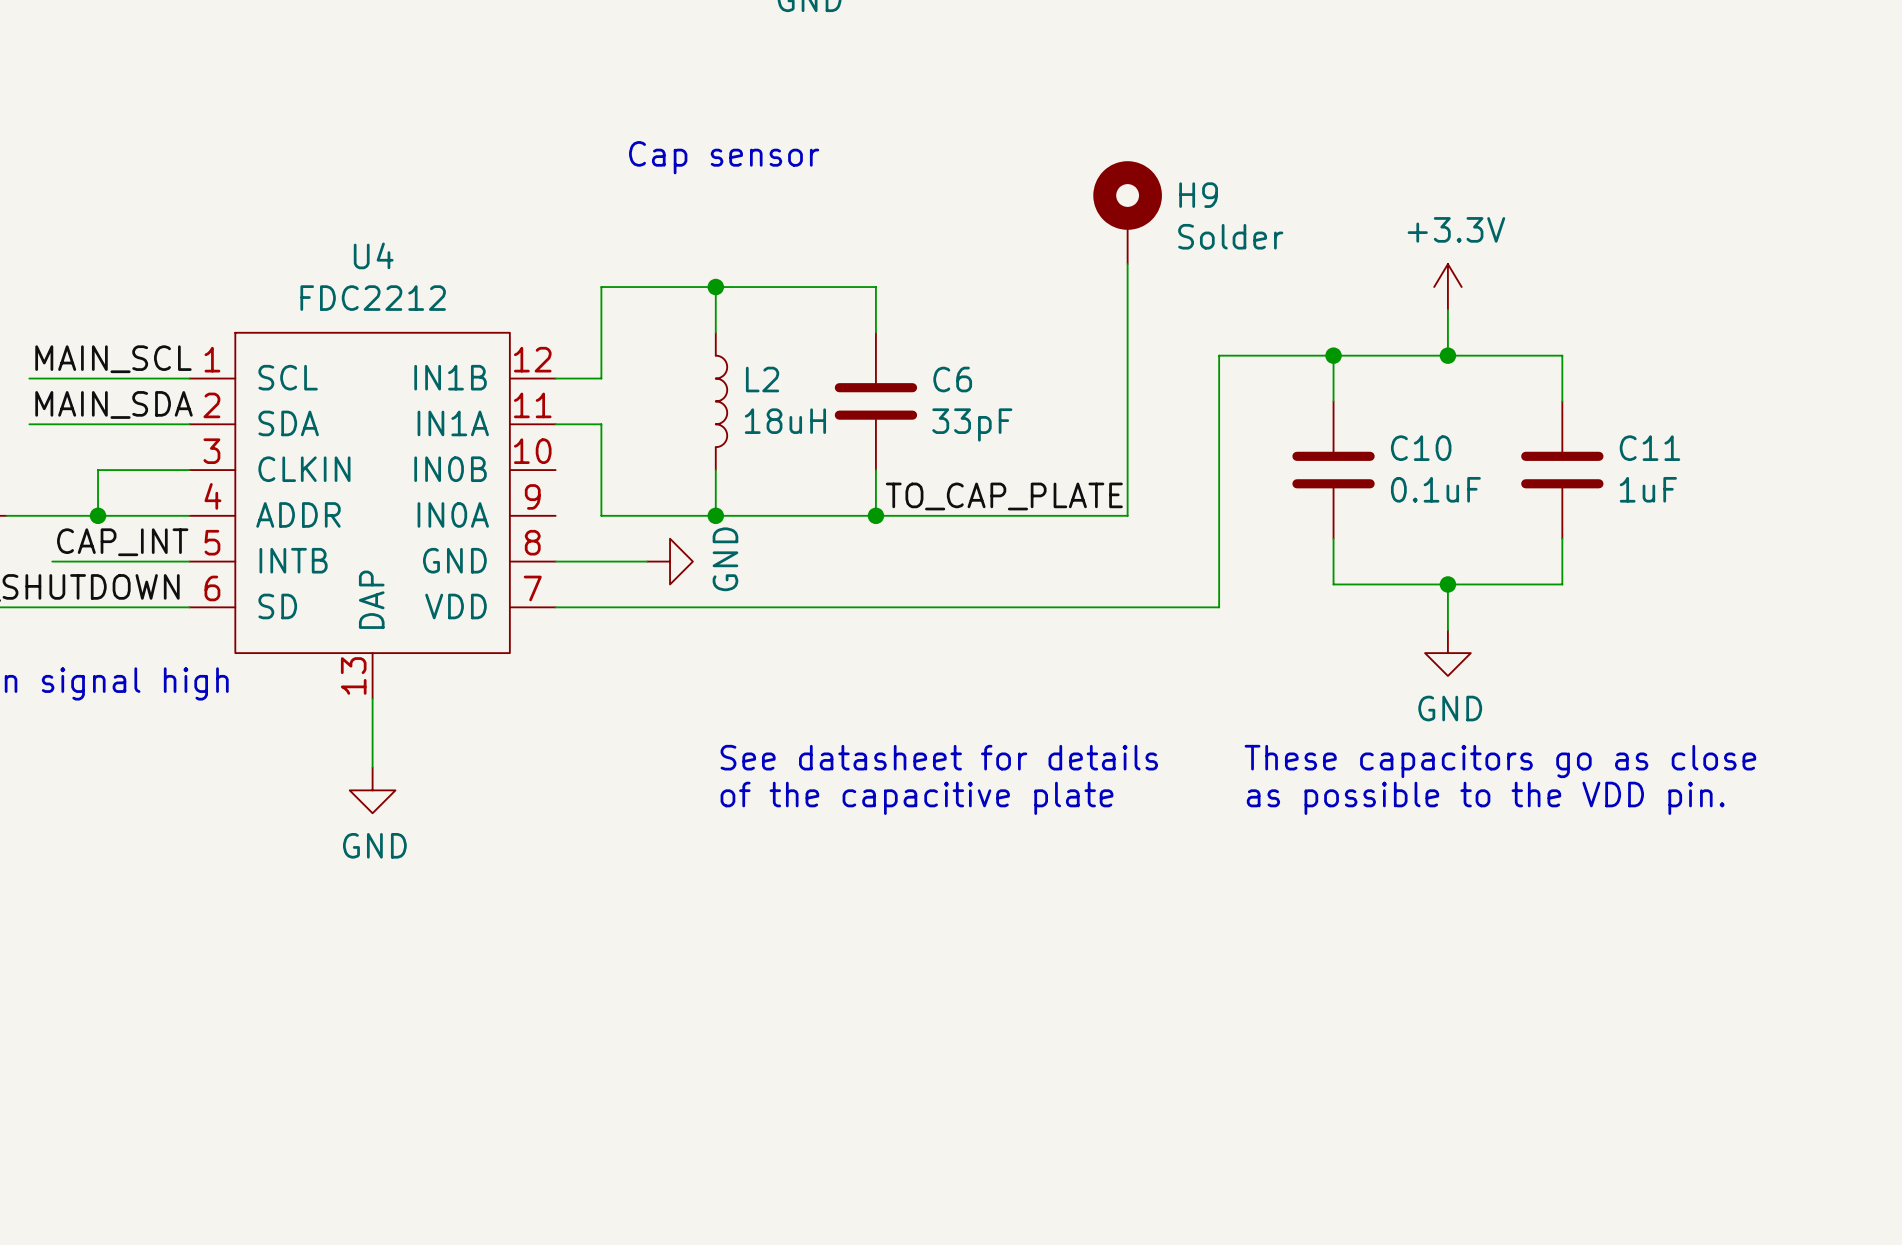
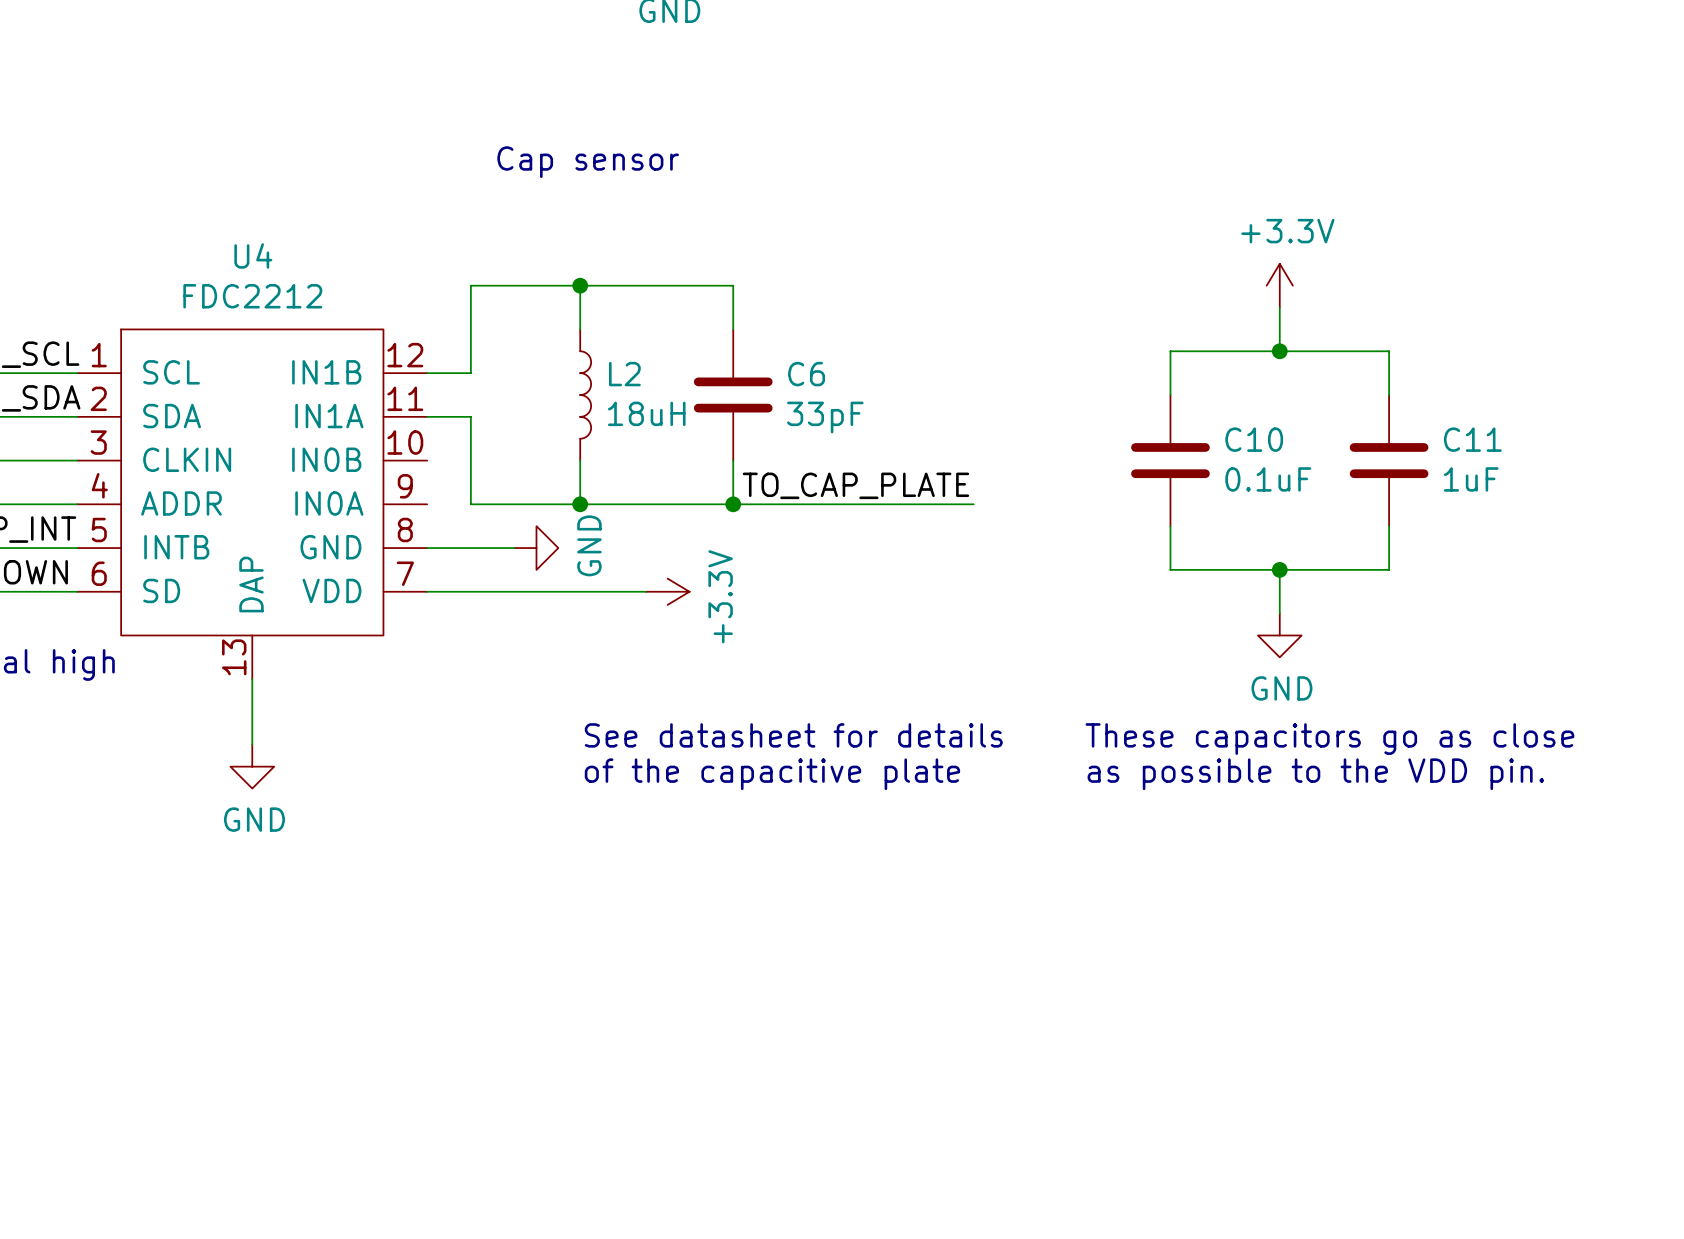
H9: Solder (1127, 212) -> none
wire: (1127, 264) (1127, 515) -> none
wire: (1333, 355) (1219, 355) (1219, 607) (784, 607) -> none
junction: (1333, 355) -> none
power symbol: none -> +3.3V (667, 591)

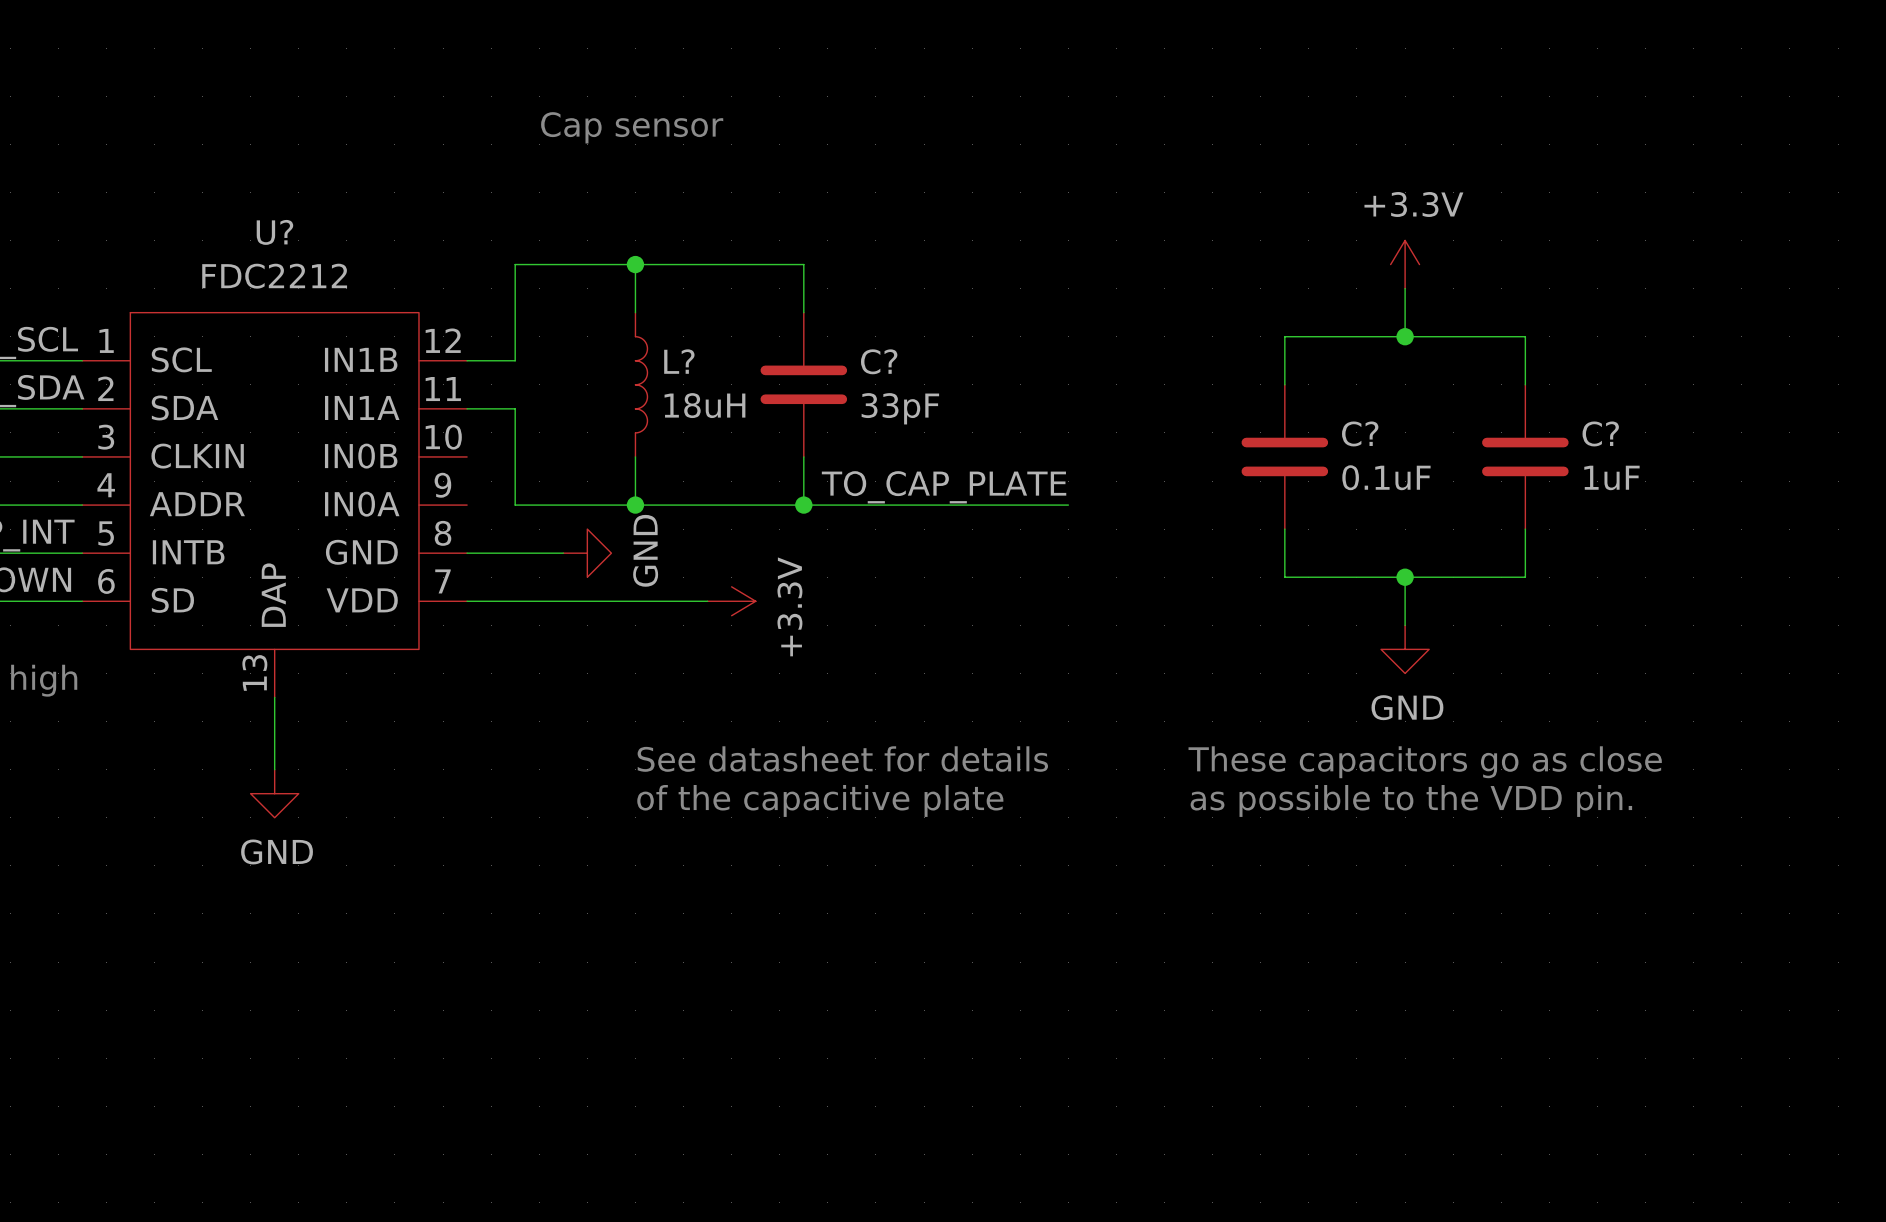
U4 name: U4 (253, 255) -> U? (274, 232)
L2 name: L2 (624, 374) -> L? (679, 361)
C6 name: C6 (806, 374) -> C? (879, 361)
C10 name: C10 (1254, 439) -> C? (1360, 433)
C11 name: C11 (1472, 439) -> C? (1600, 433)

